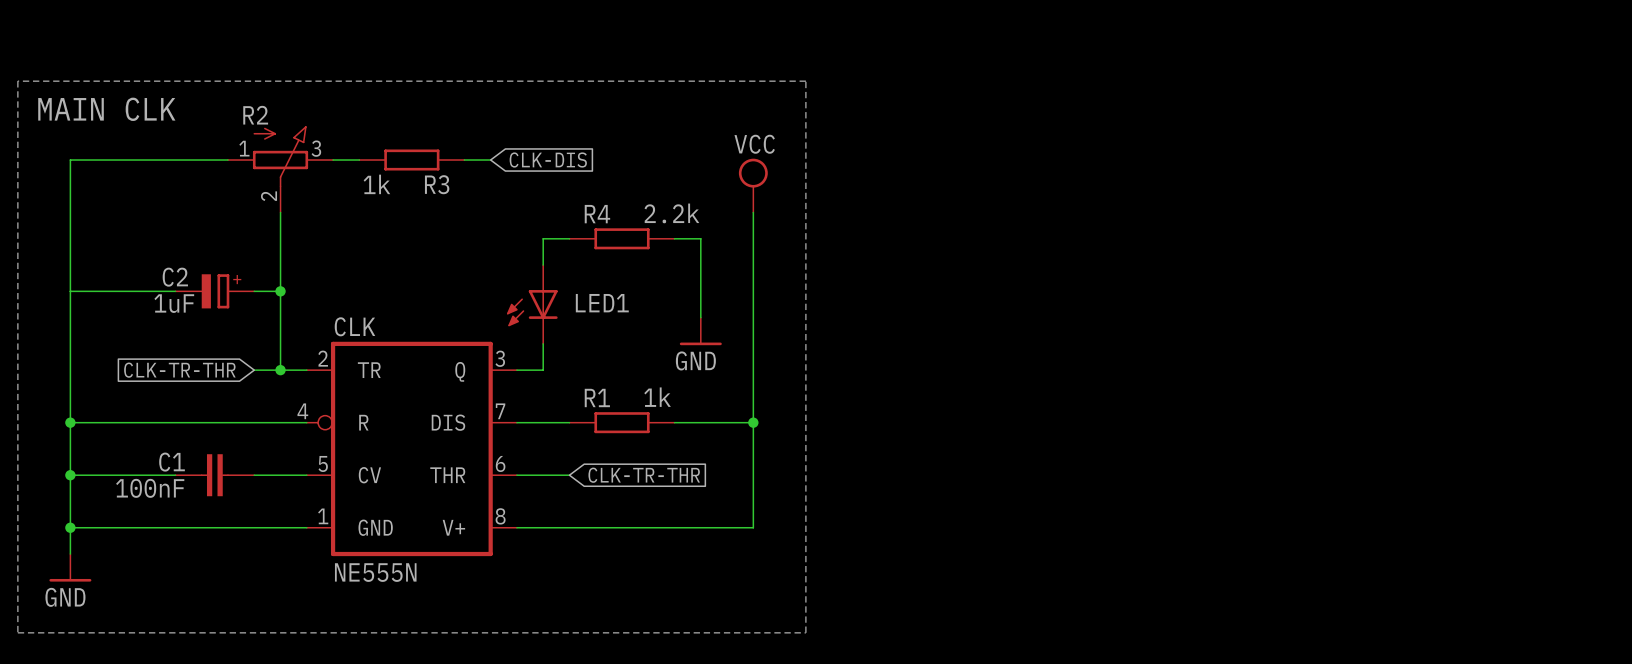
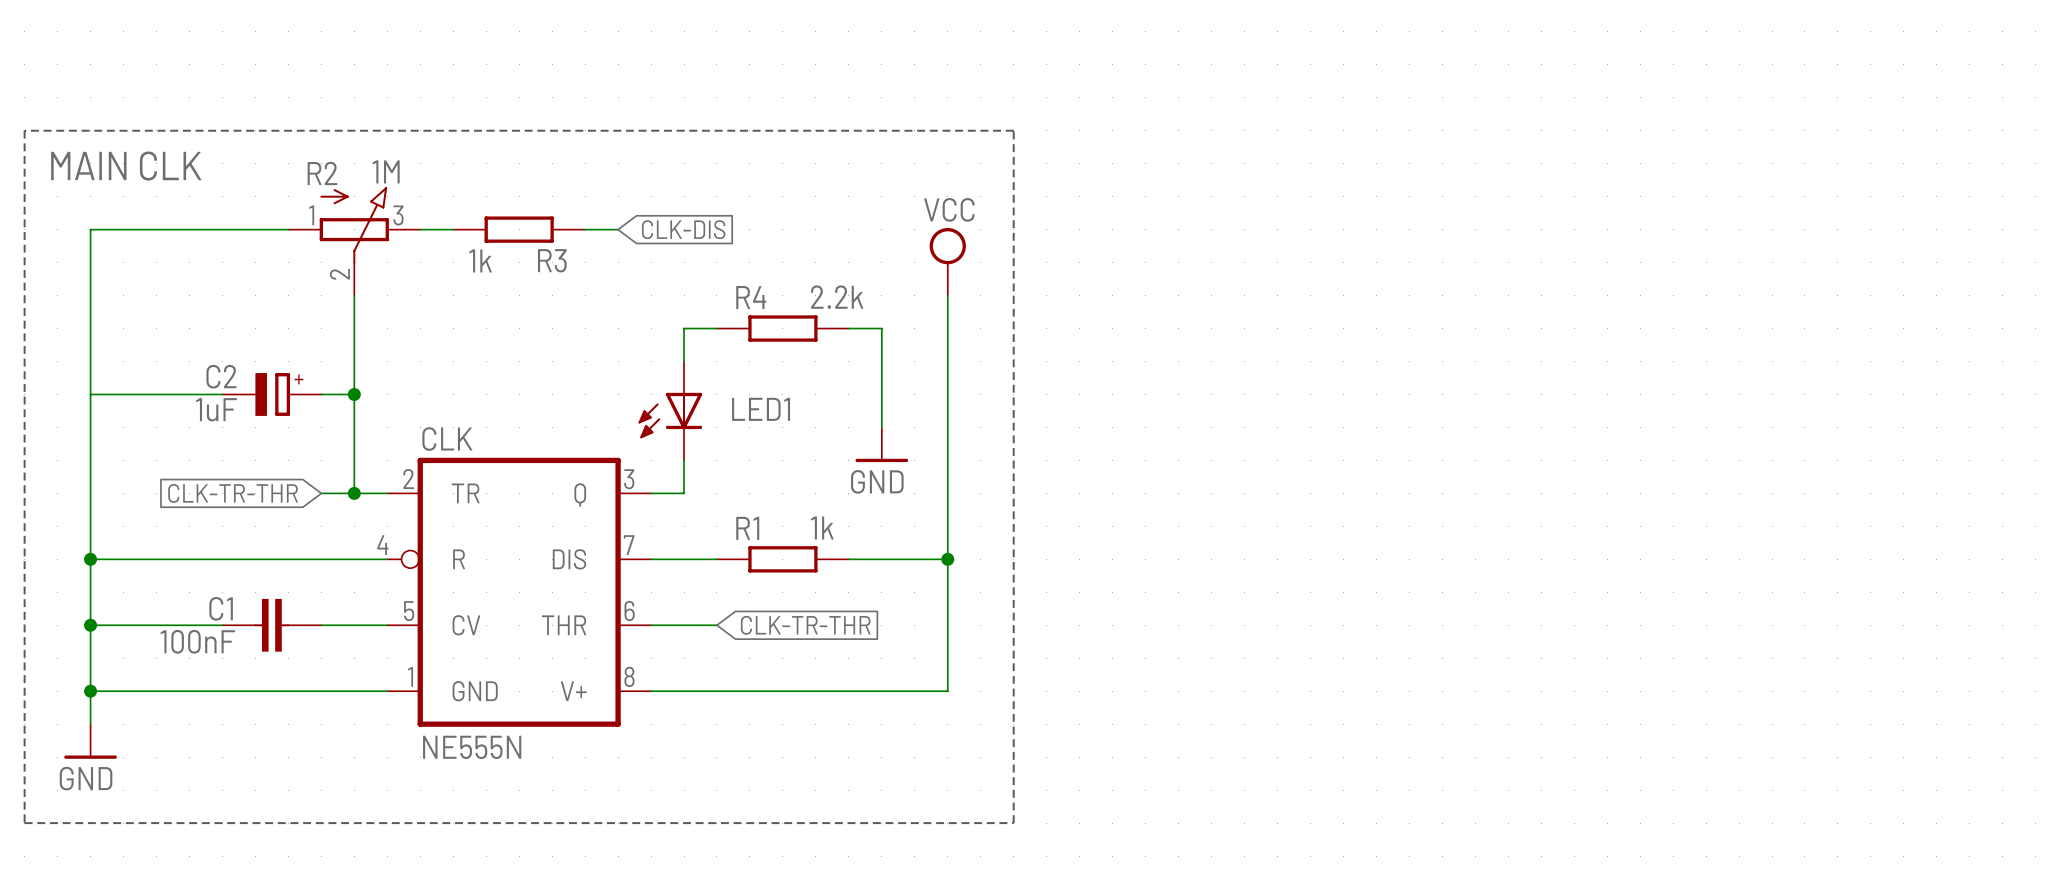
R2 value: none -> 1M (386, 171)

